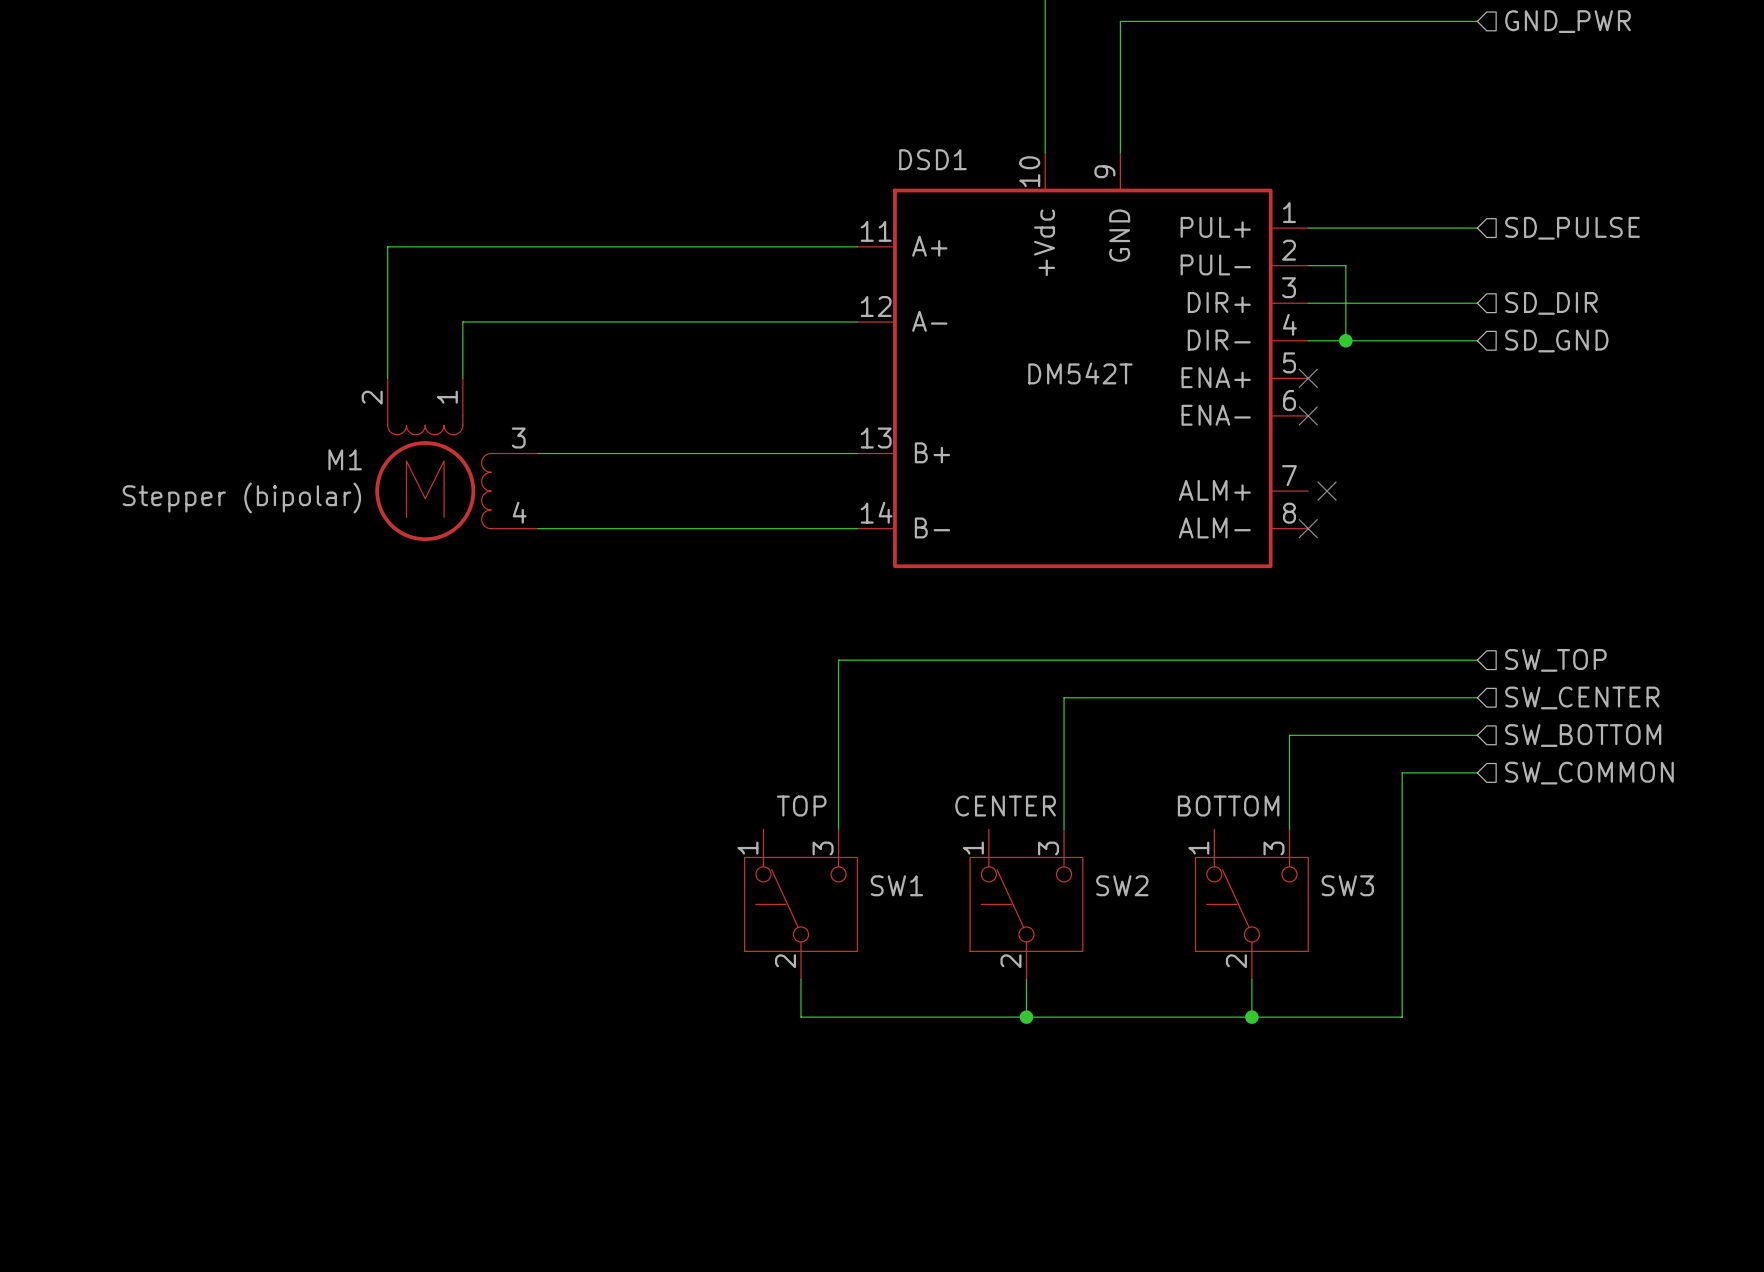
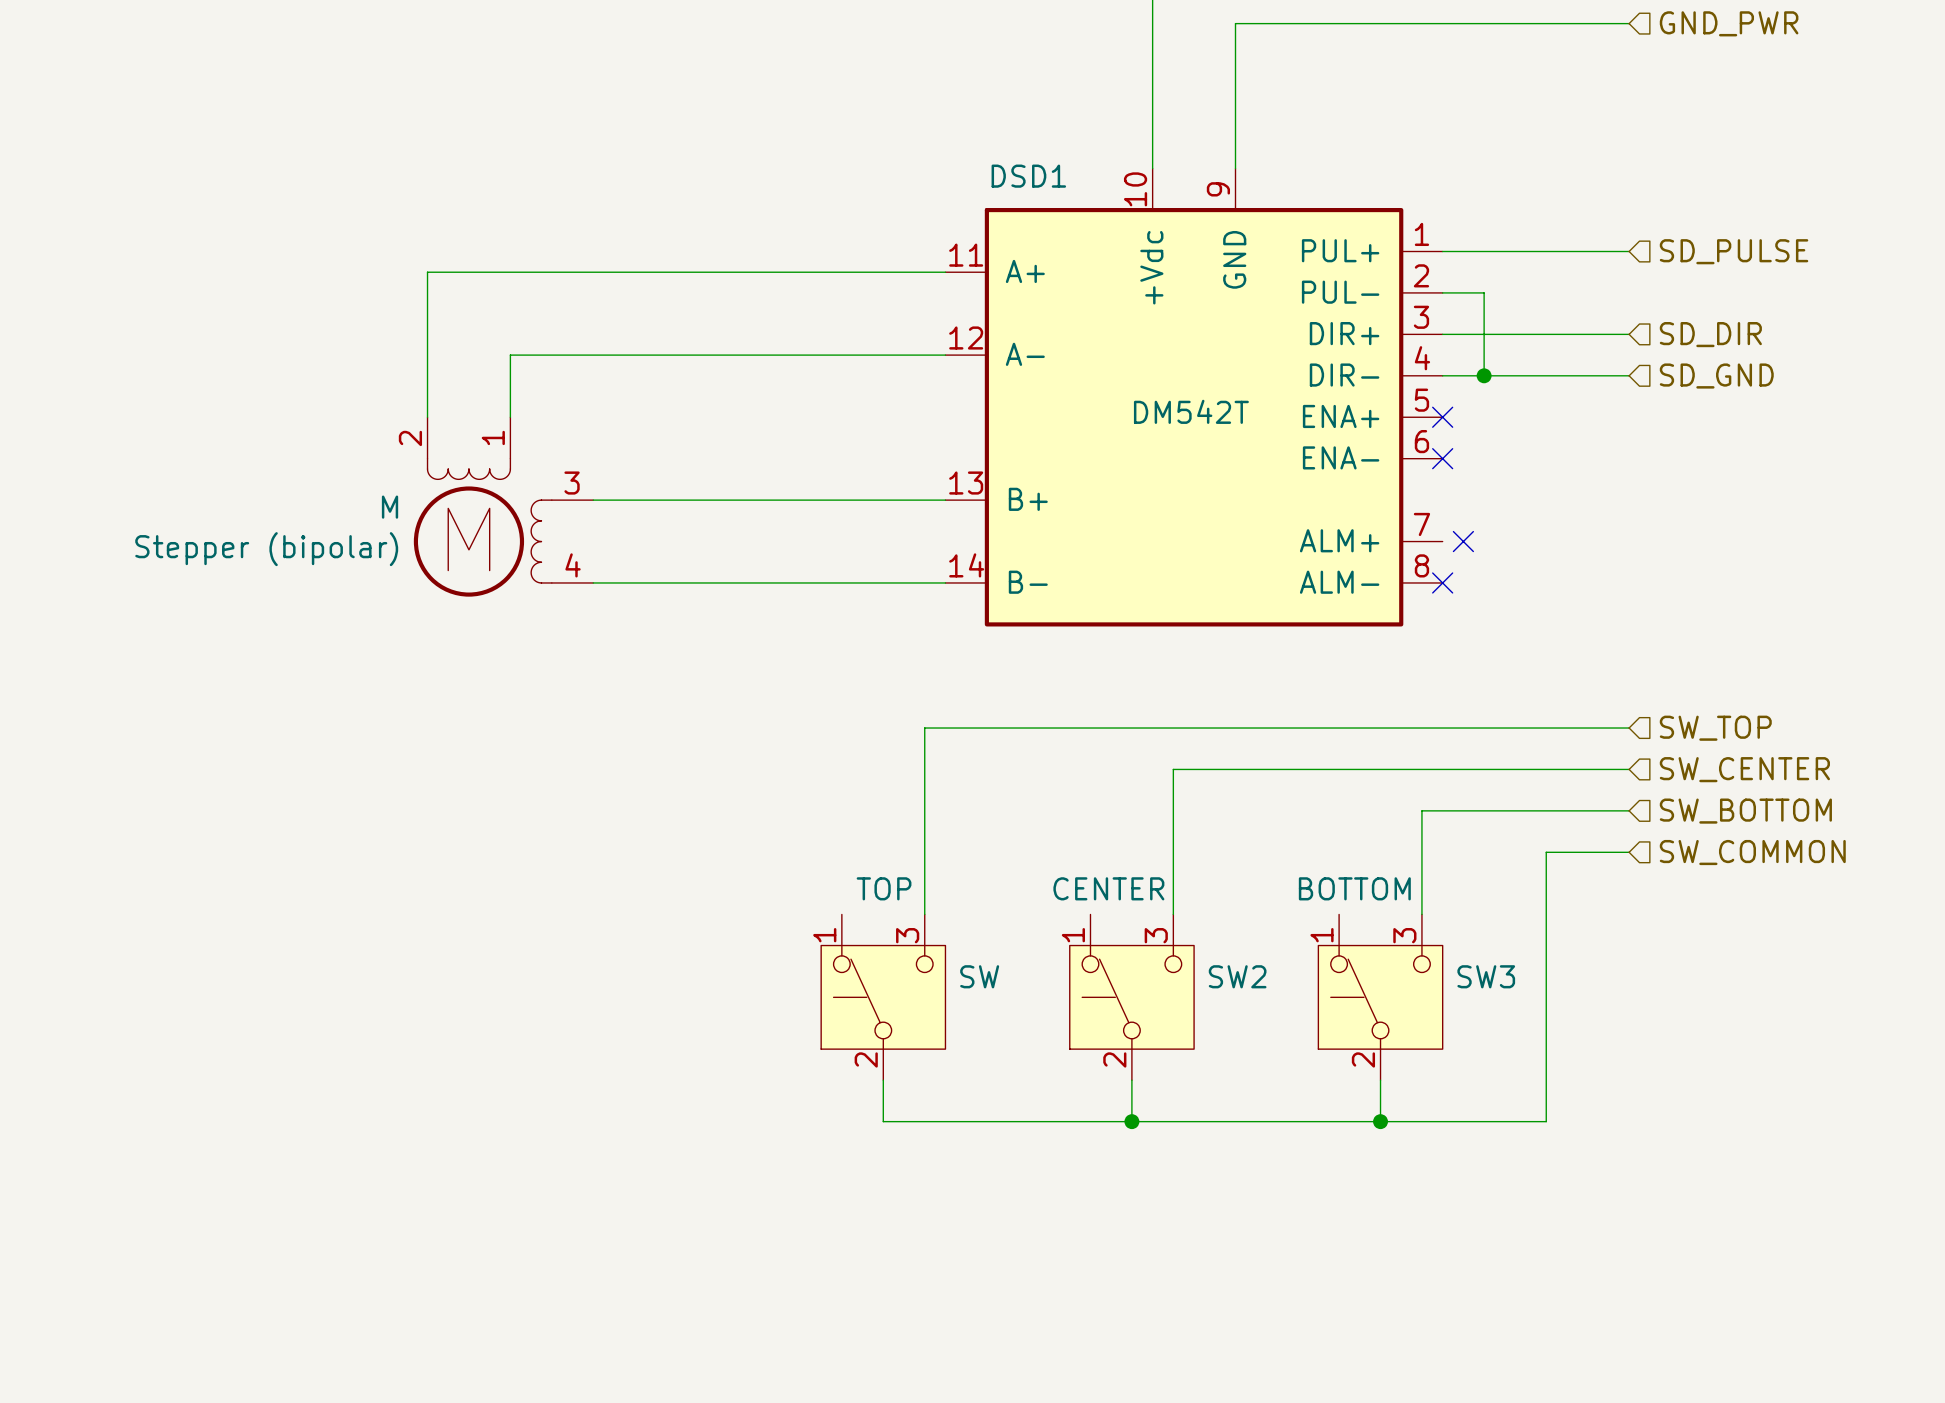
M1 name: M1 (345, 459) -> M (390, 507)
SW1 name: SW1 (896, 885) -> SW (979, 976)

